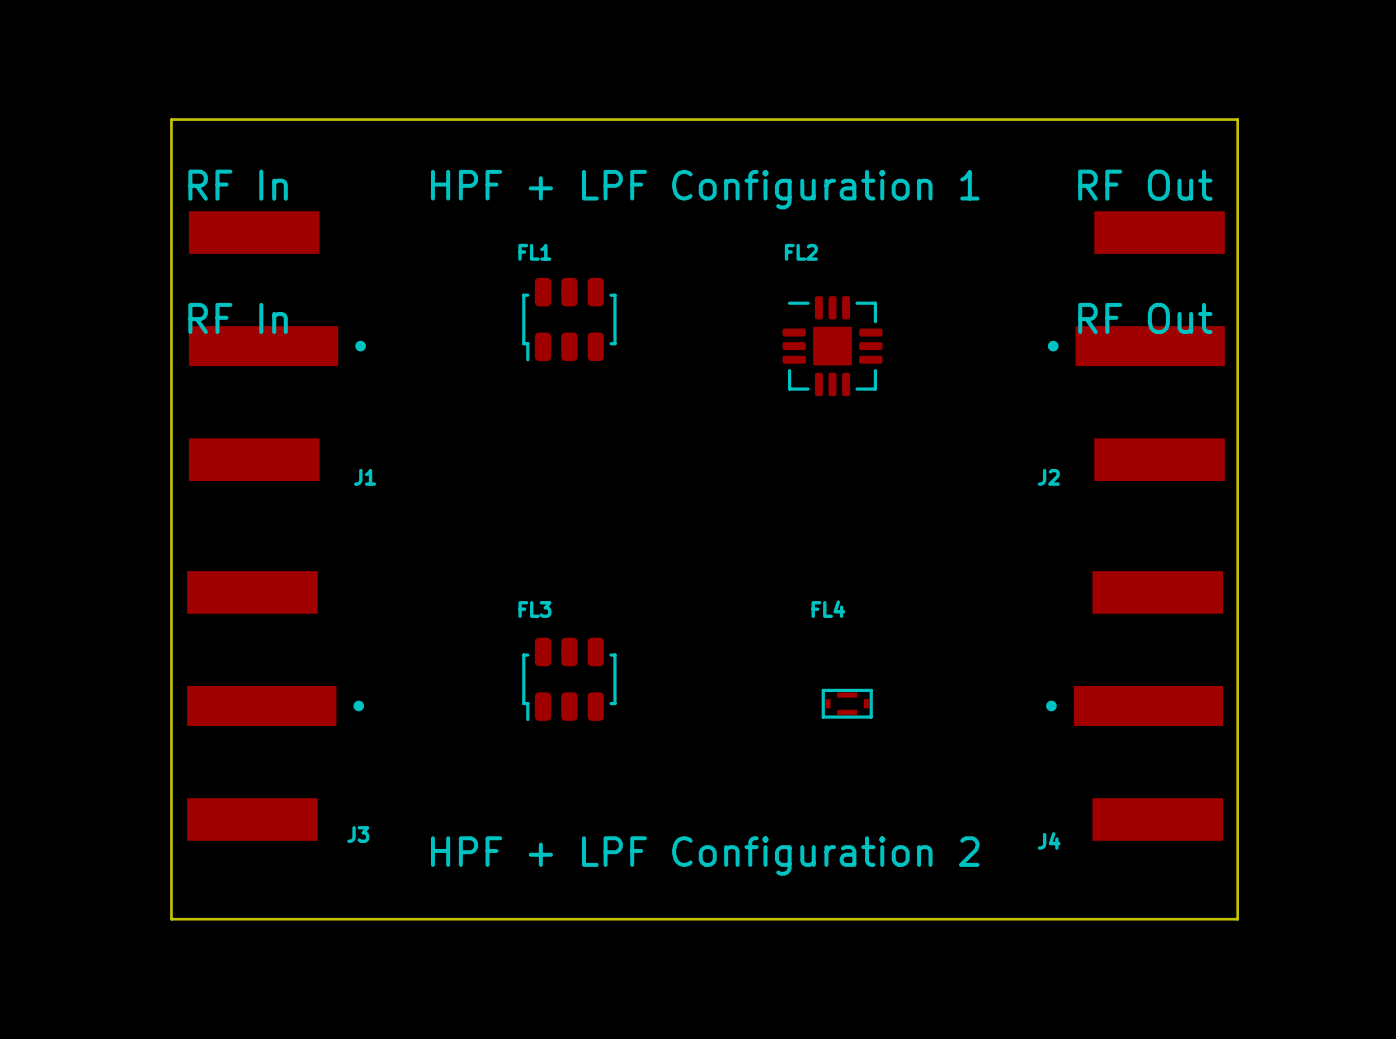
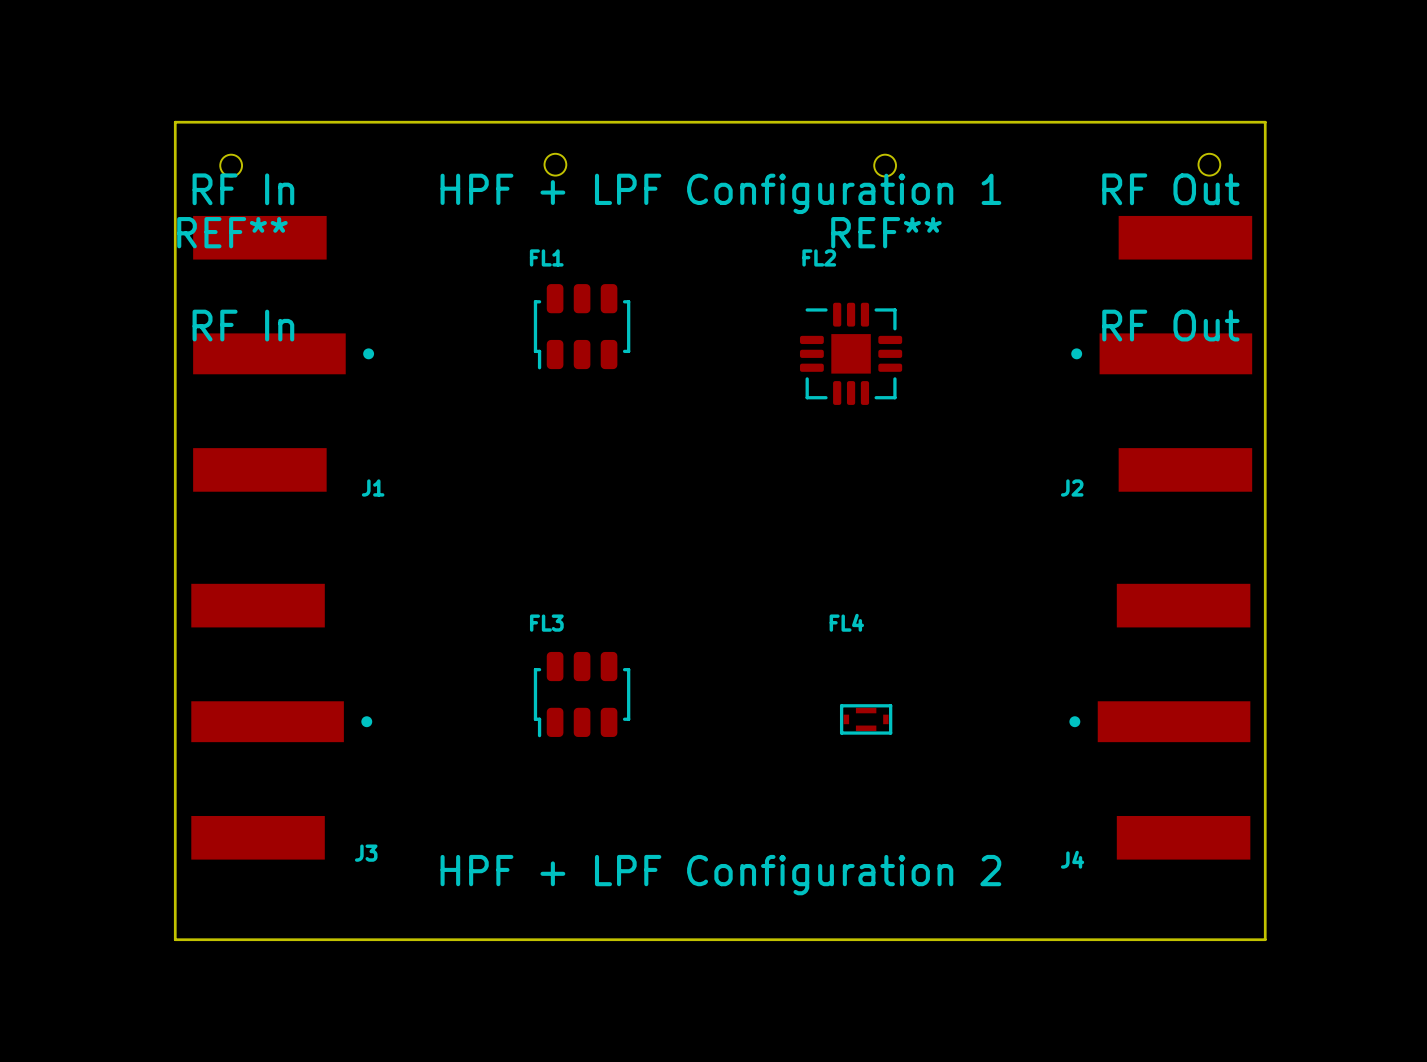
REF**: none -> (393, 165)
REF**: none -> (1047, 165)

